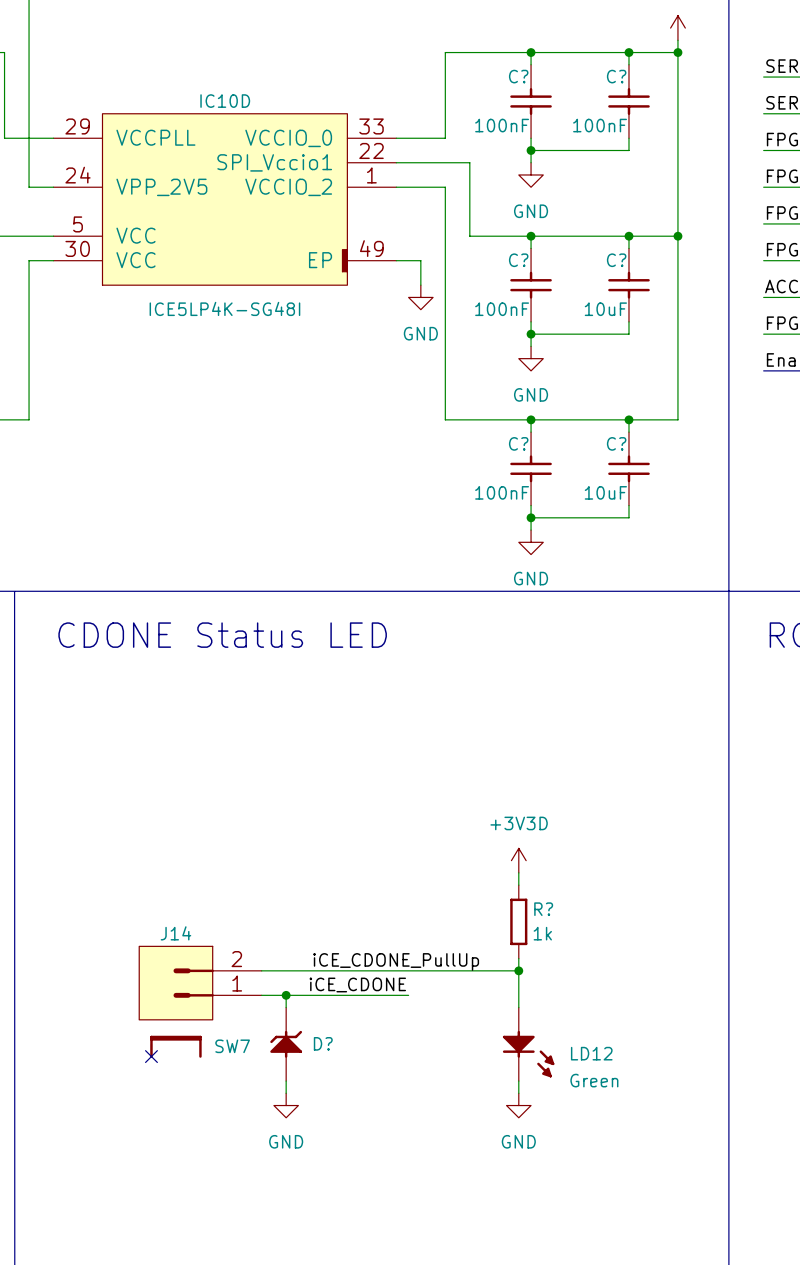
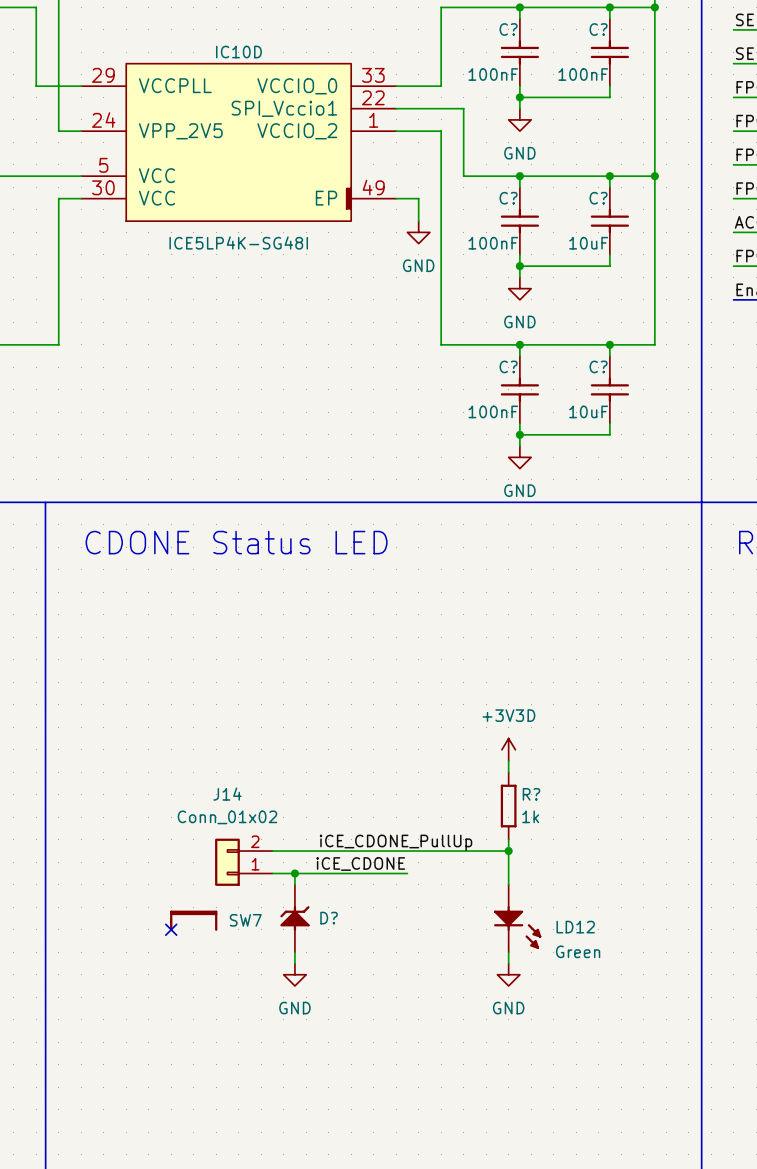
J14 name position: J14 (175, 933) -> J14 (227, 794)
J14 value: none -> Conn_01x02 (227, 817)
J14 symbol: [139, 946, 262, 1020] -> [215, 838, 273, 886]

